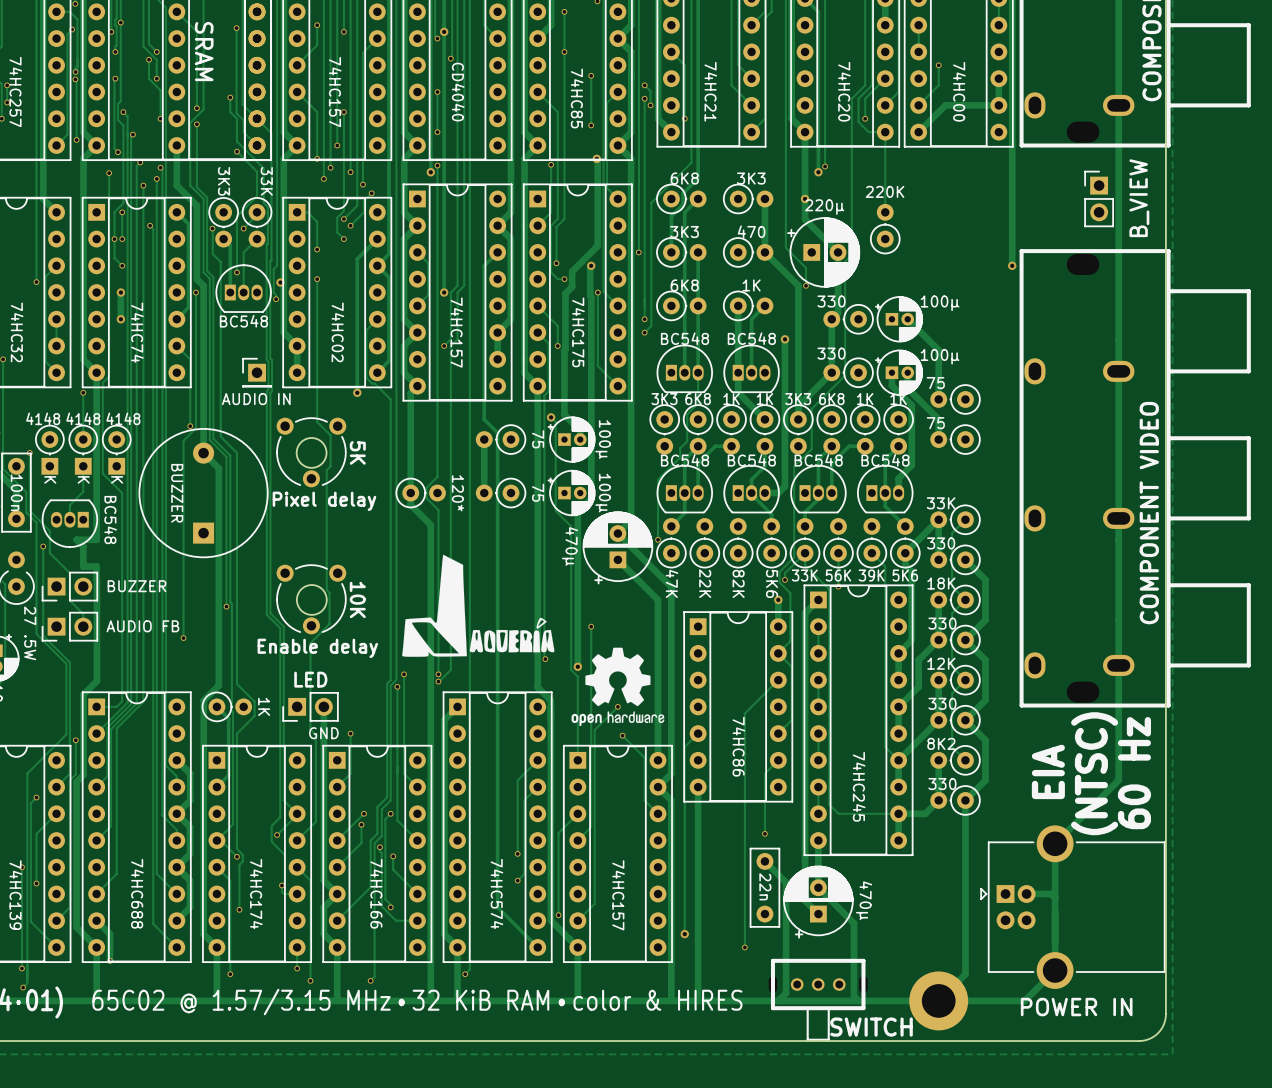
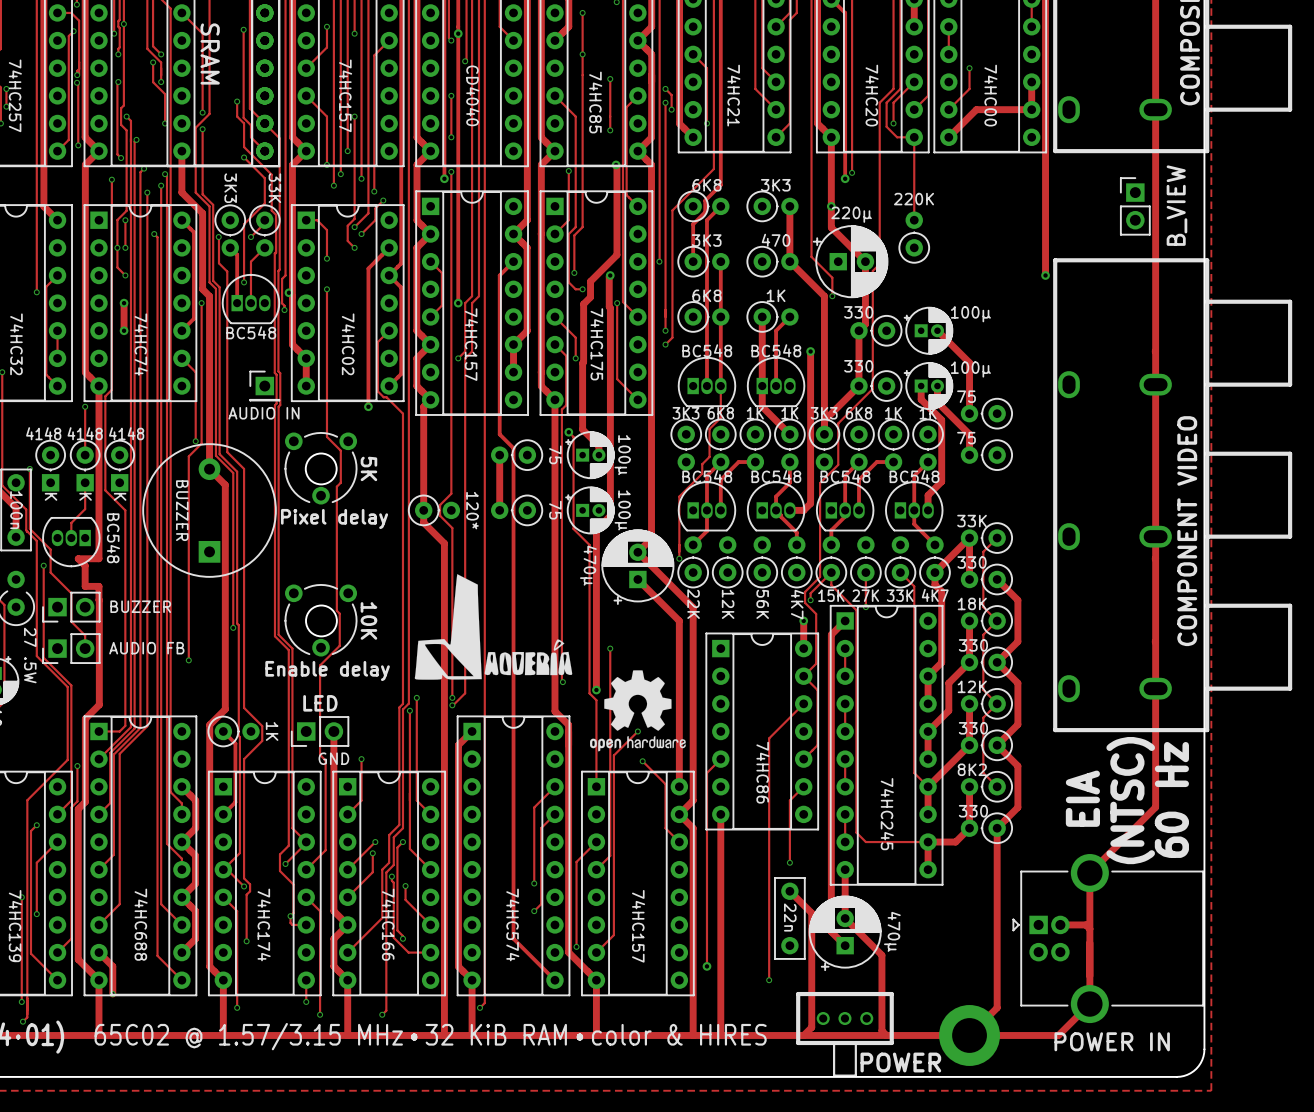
part value: 33K (804, 575) -> 15K (831, 595)
part value: 56K (838, 575) -> 27K (865, 595)
part value: 39K (871, 575) -> 33K (900, 595)
part value: 5K6 (905, 575) -> 4K7 (935, 595)
part value: 47K (672, 583) -> 22K (693, 604)
part value: 22K (705, 583) -> 12K (728, 604)
part value: 82K (738, 583) -> 56K (762, 604)
part value: 5K6 (772, 583) -> 4K7 (797, 604)
part value: SWITCH (871, 1027) -> POWER (900, 1062)

